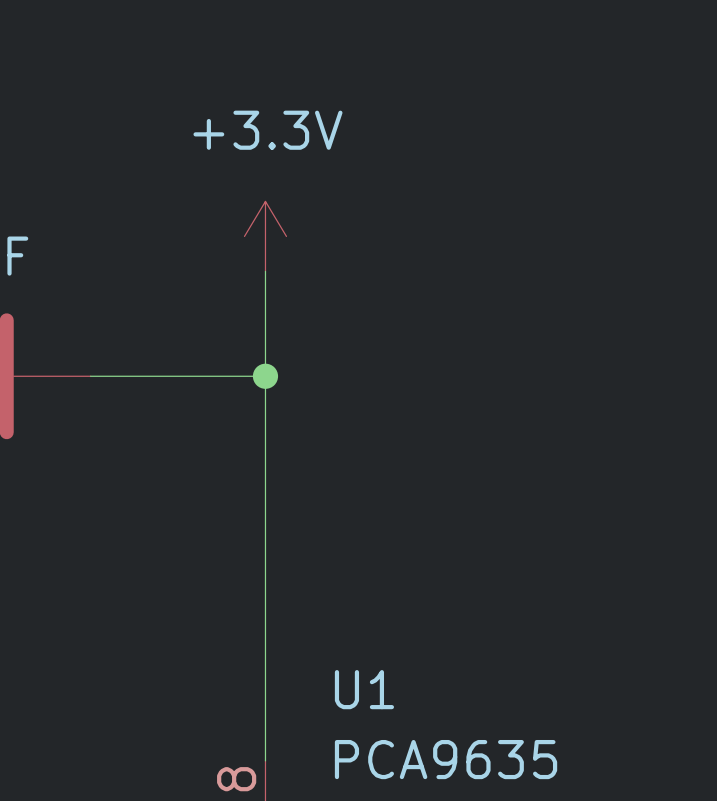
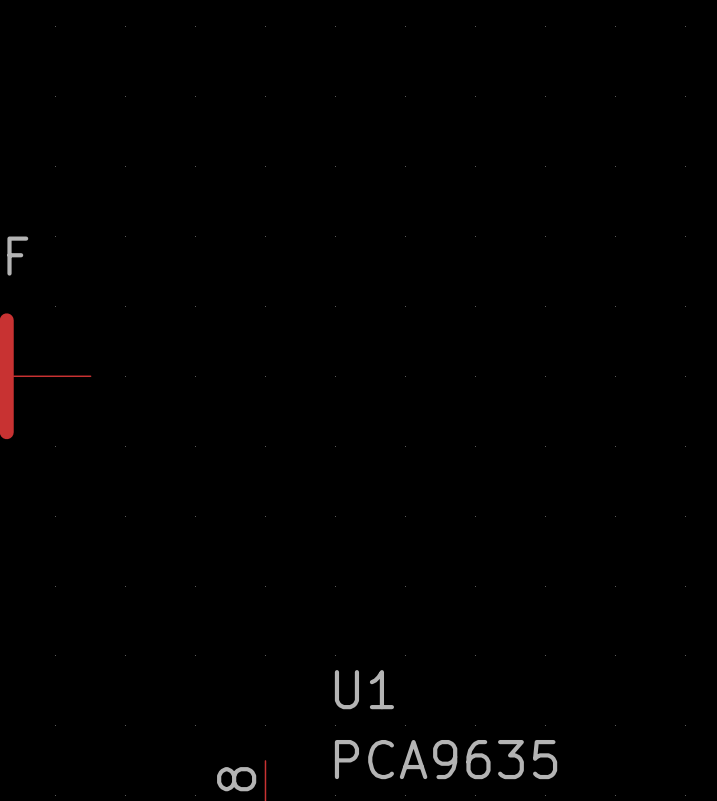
power symbol: +3.3V (265, 236) -> none
wire: (265, 271) (265, 760) -> none
wire: (90, 376) (265, 376) -> none
junction: (265, 376) -> none

